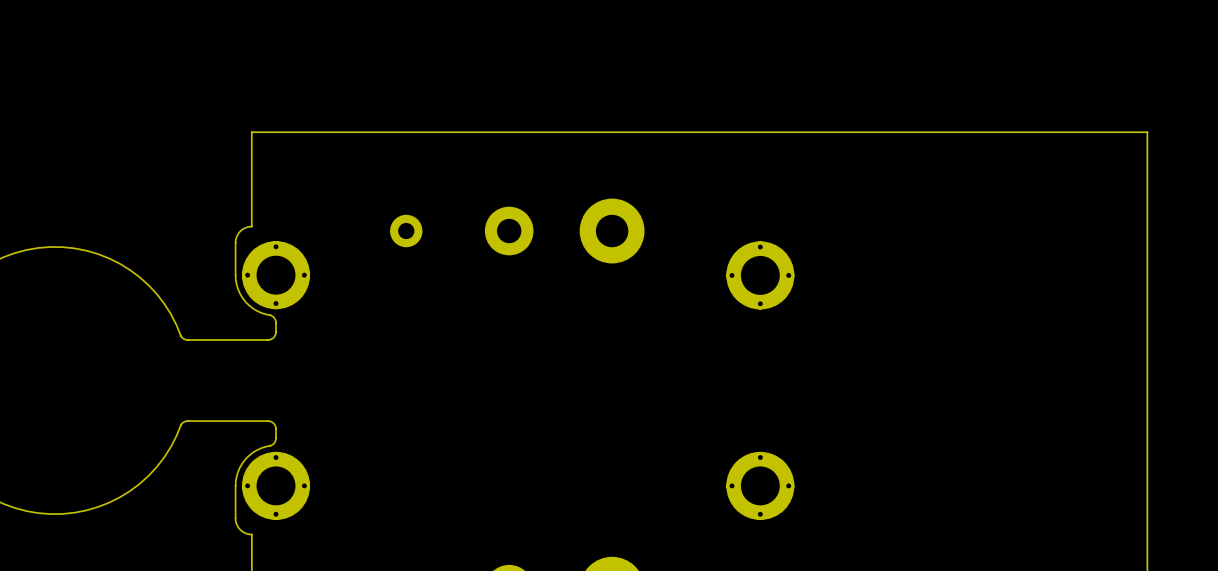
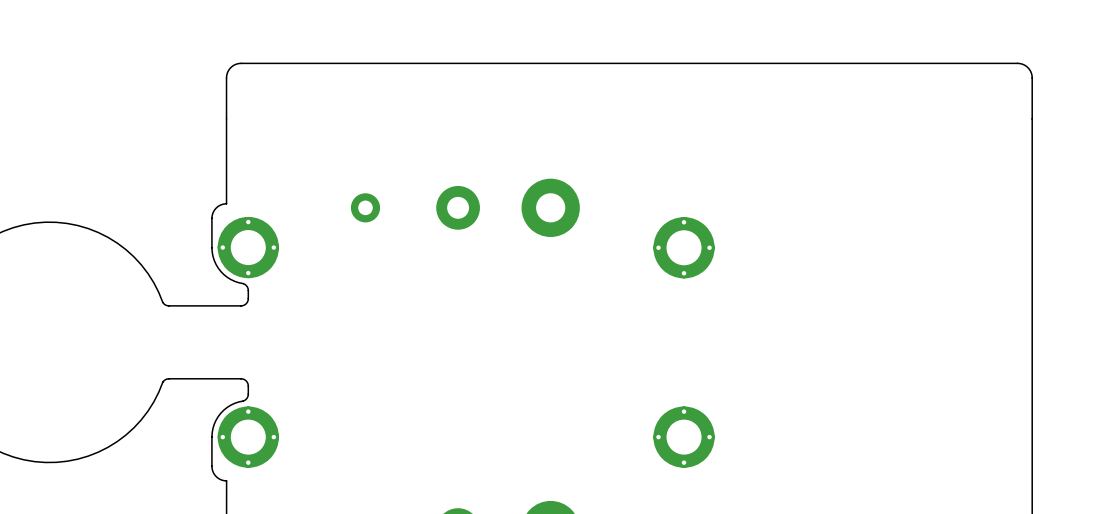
board edge: (1147, 132) (251, 132) -> (1032, 118) (1031, 74) (1026, 66) (1017, 63) (239, 63) (230, 67) (227, 74) (226, 118)

